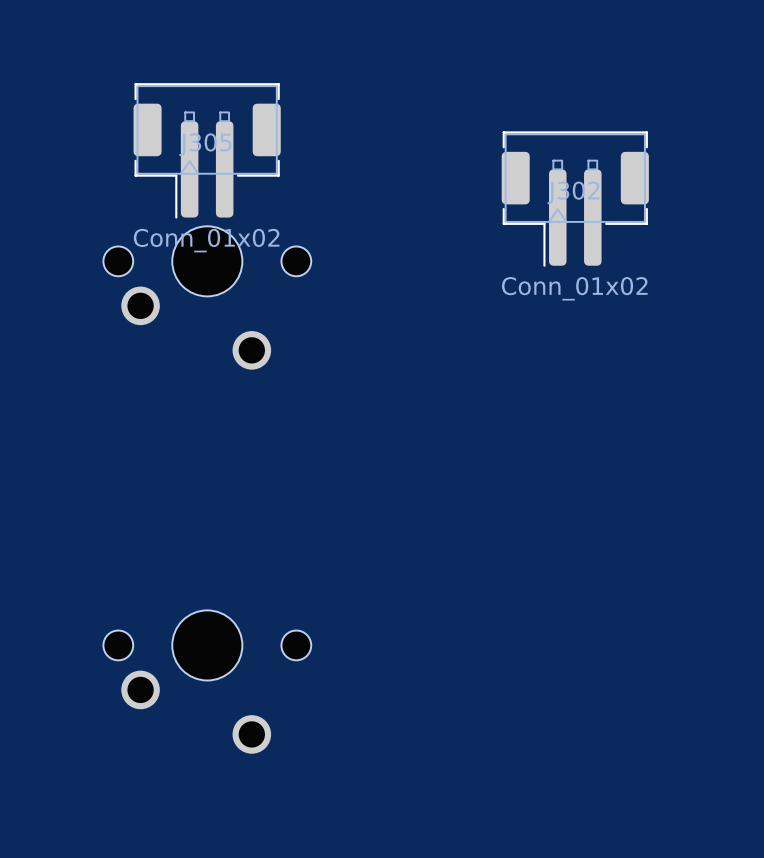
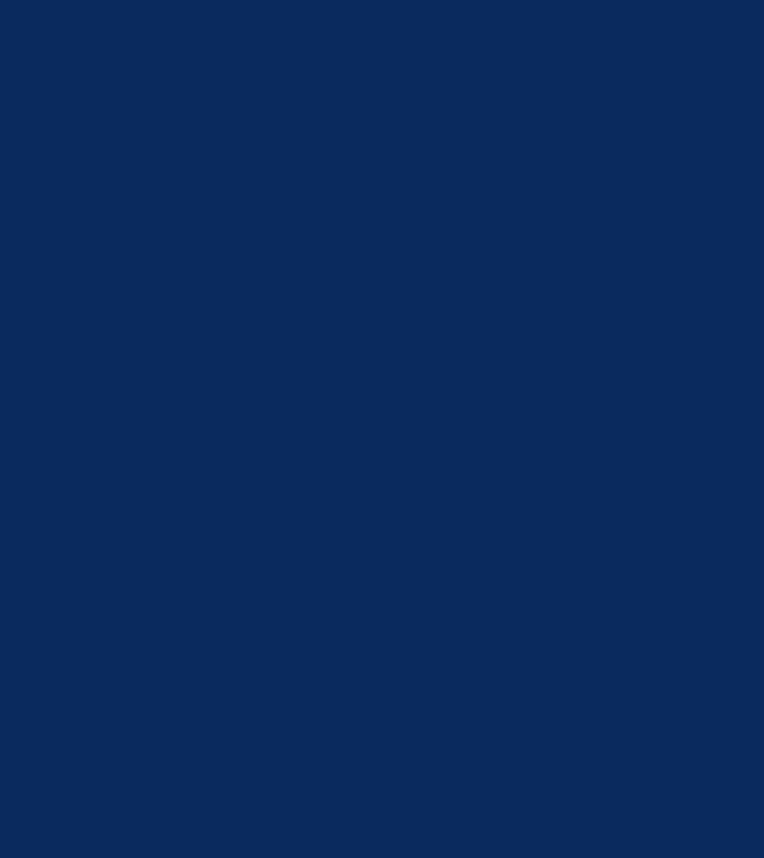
part: Conn_01x02 (207, 150) -> none
part: Conn_01x02 (575, 199) -> none
part: (207, 297) -> none
part: (207, 682) -> none

